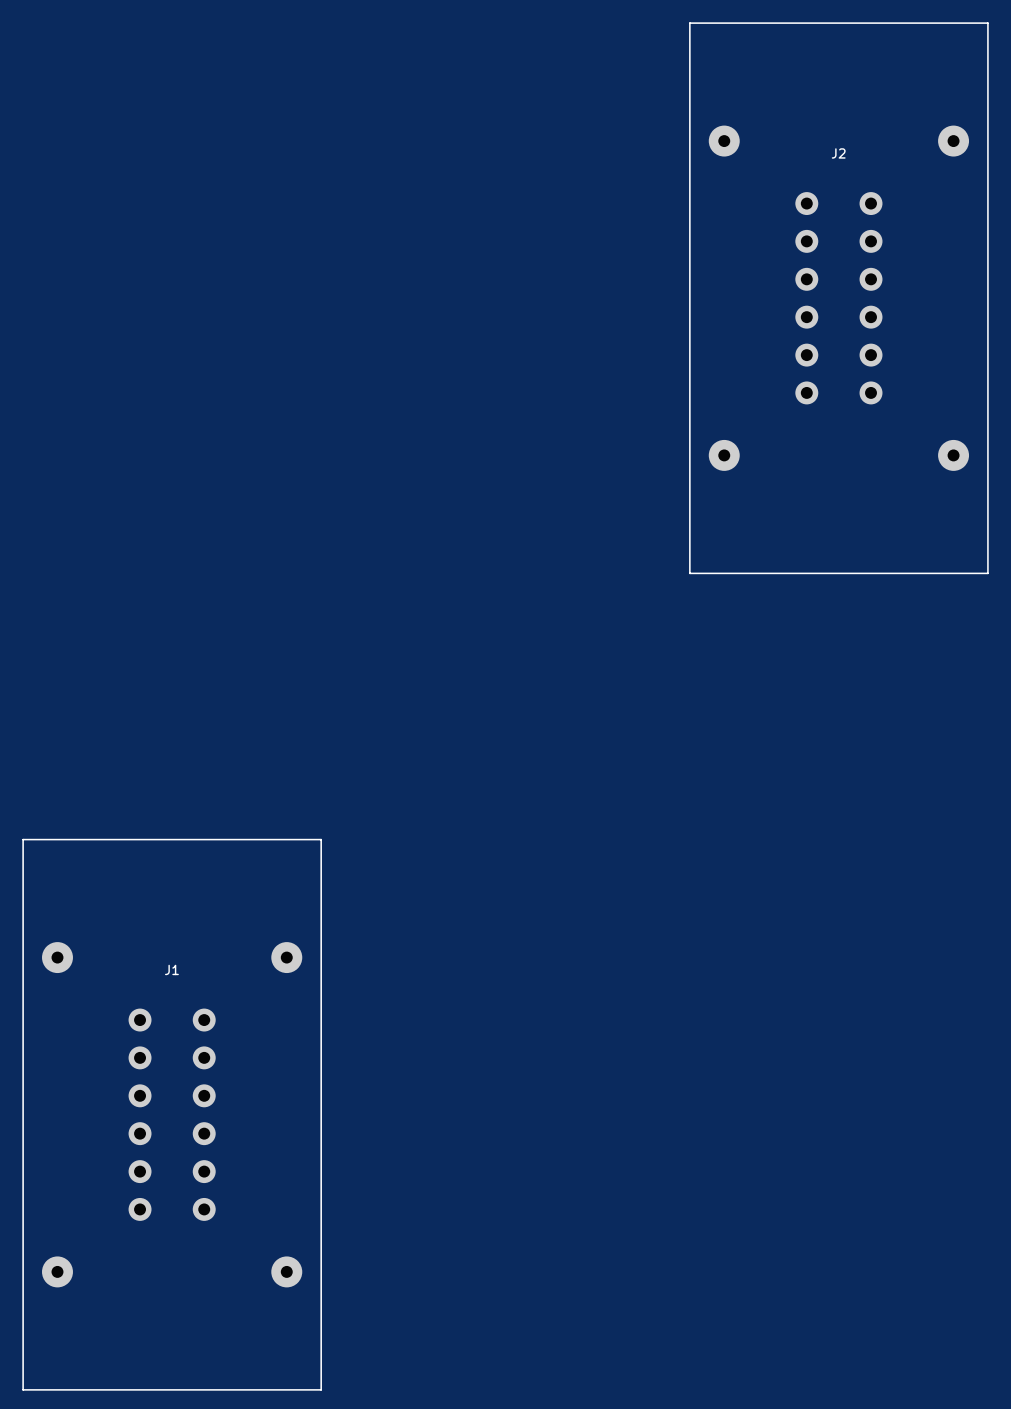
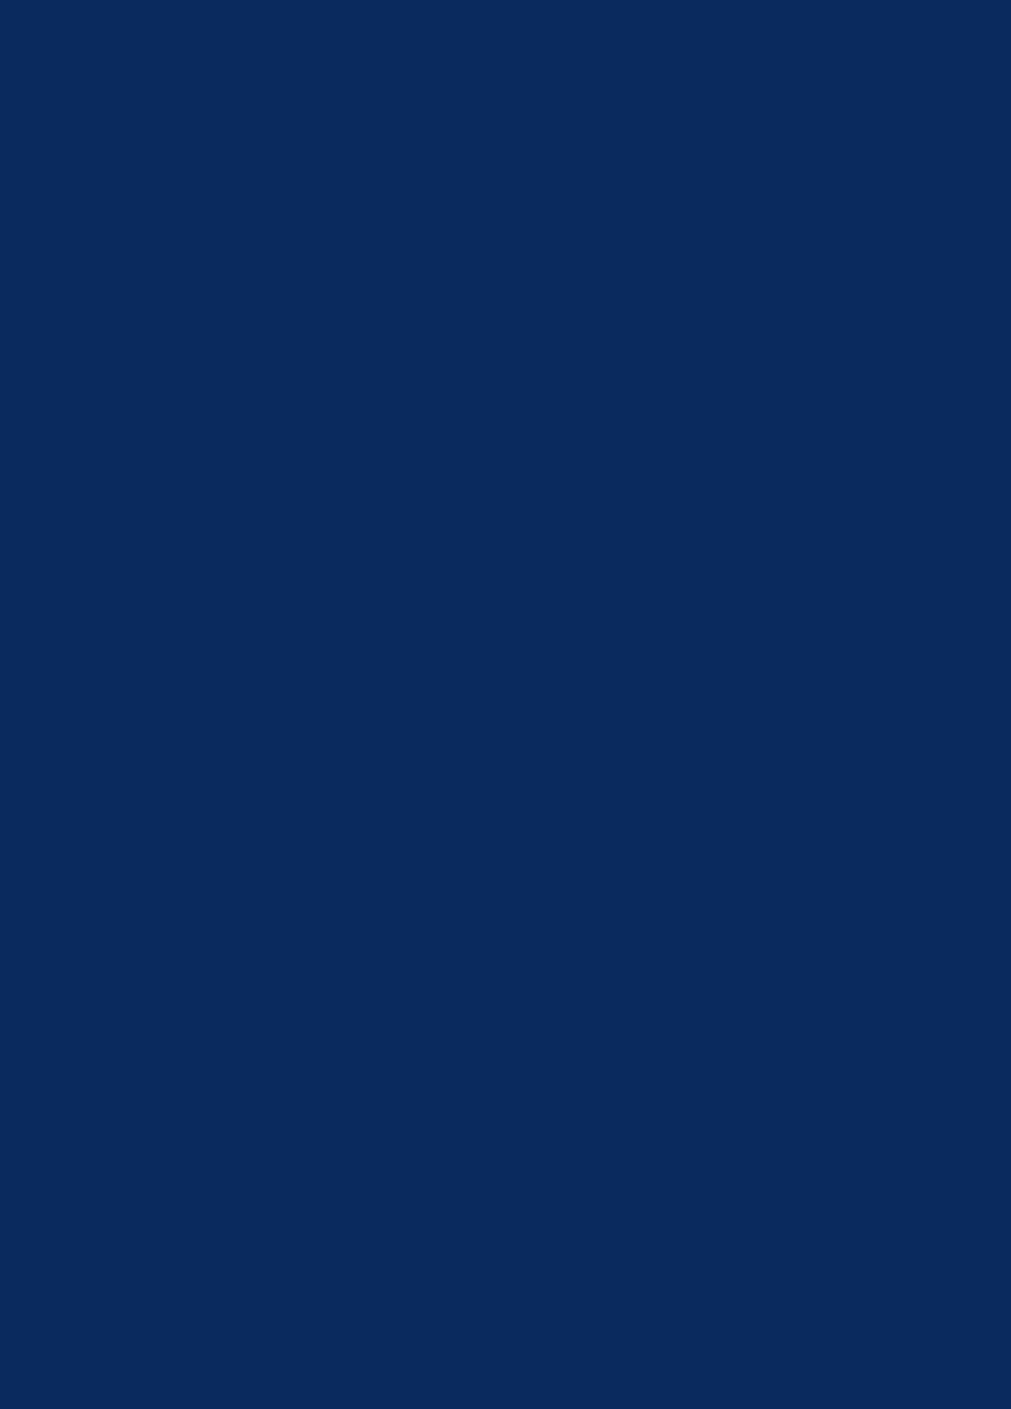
J2: (838, 298) -> none
J1: (172, 1114) -> none

